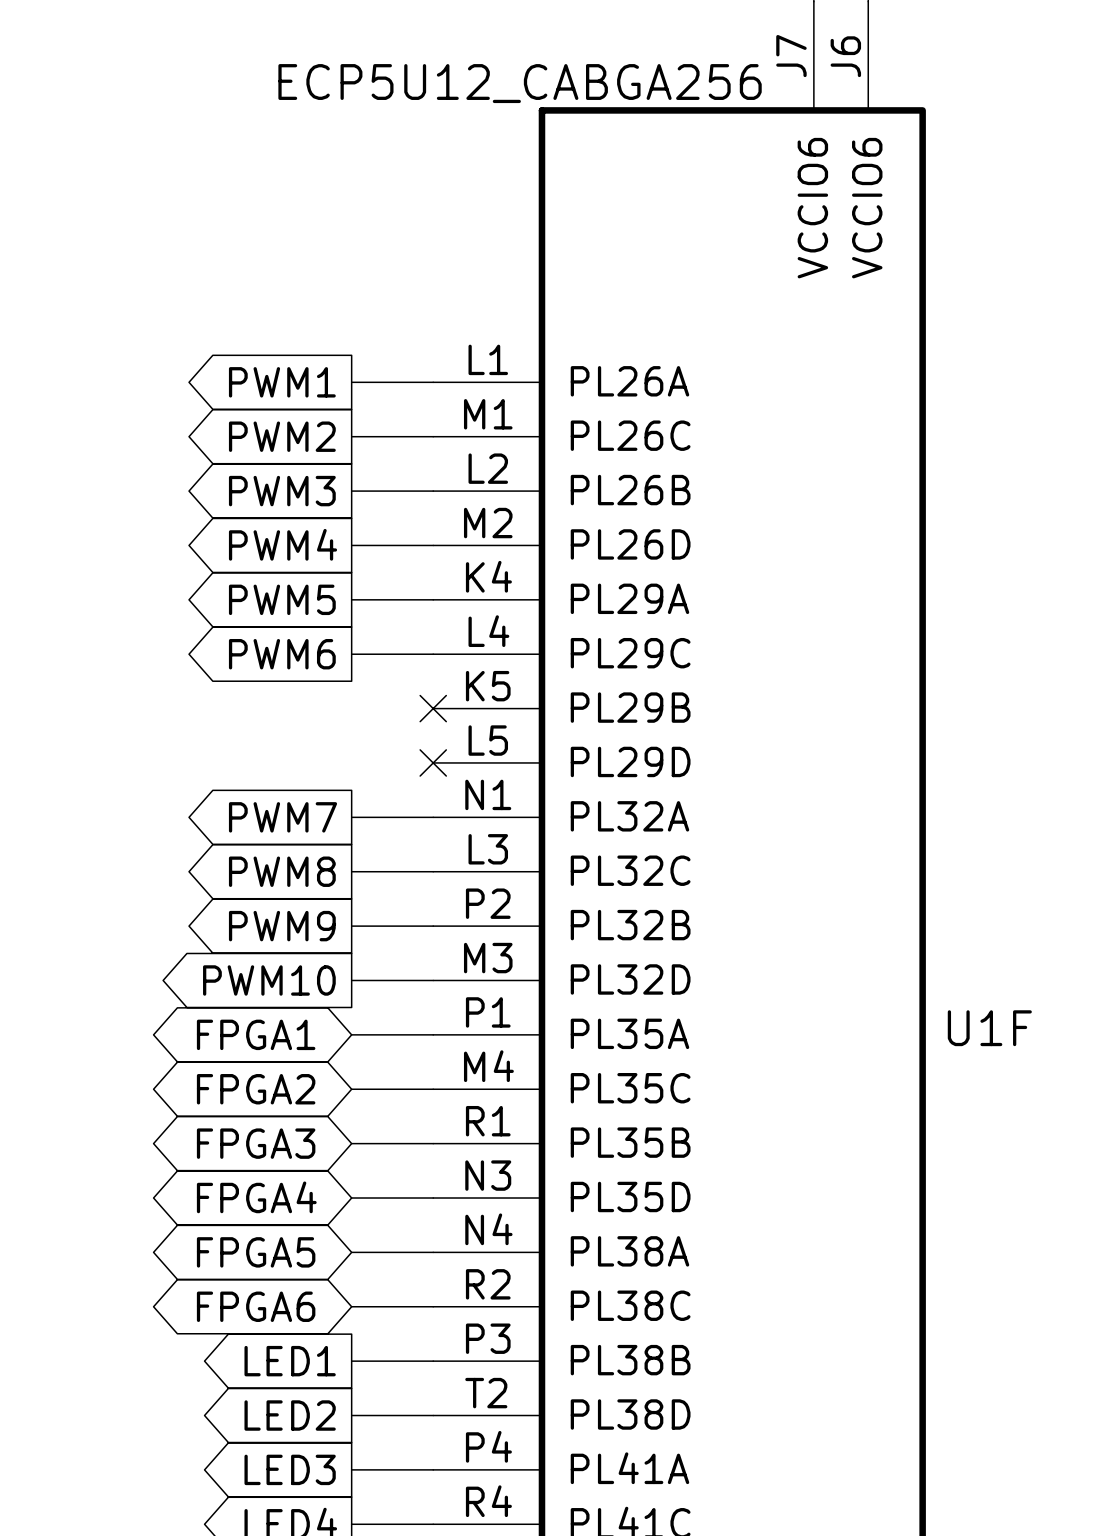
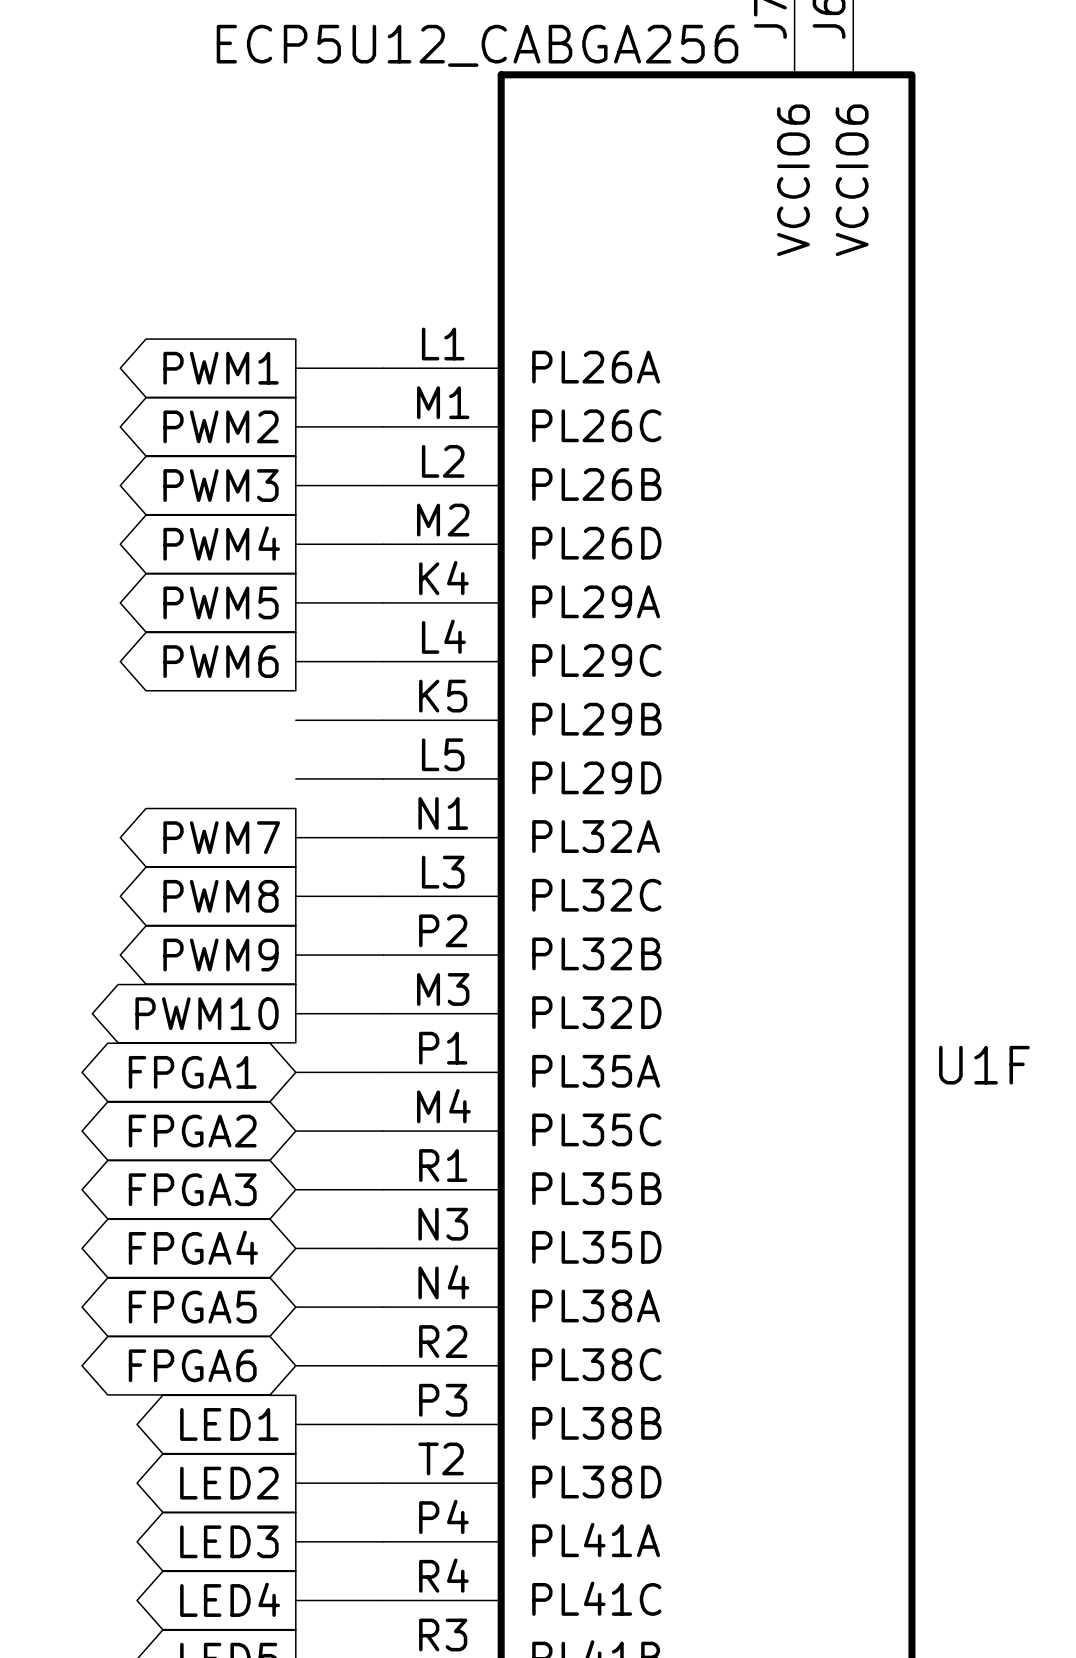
wire: none -> (295, 720) (383, 720)
no-connect mark: (433, 708) -> none
wire: none -> (295, 778) (383, 778)
no-connect mark: (433, 762) -> none

